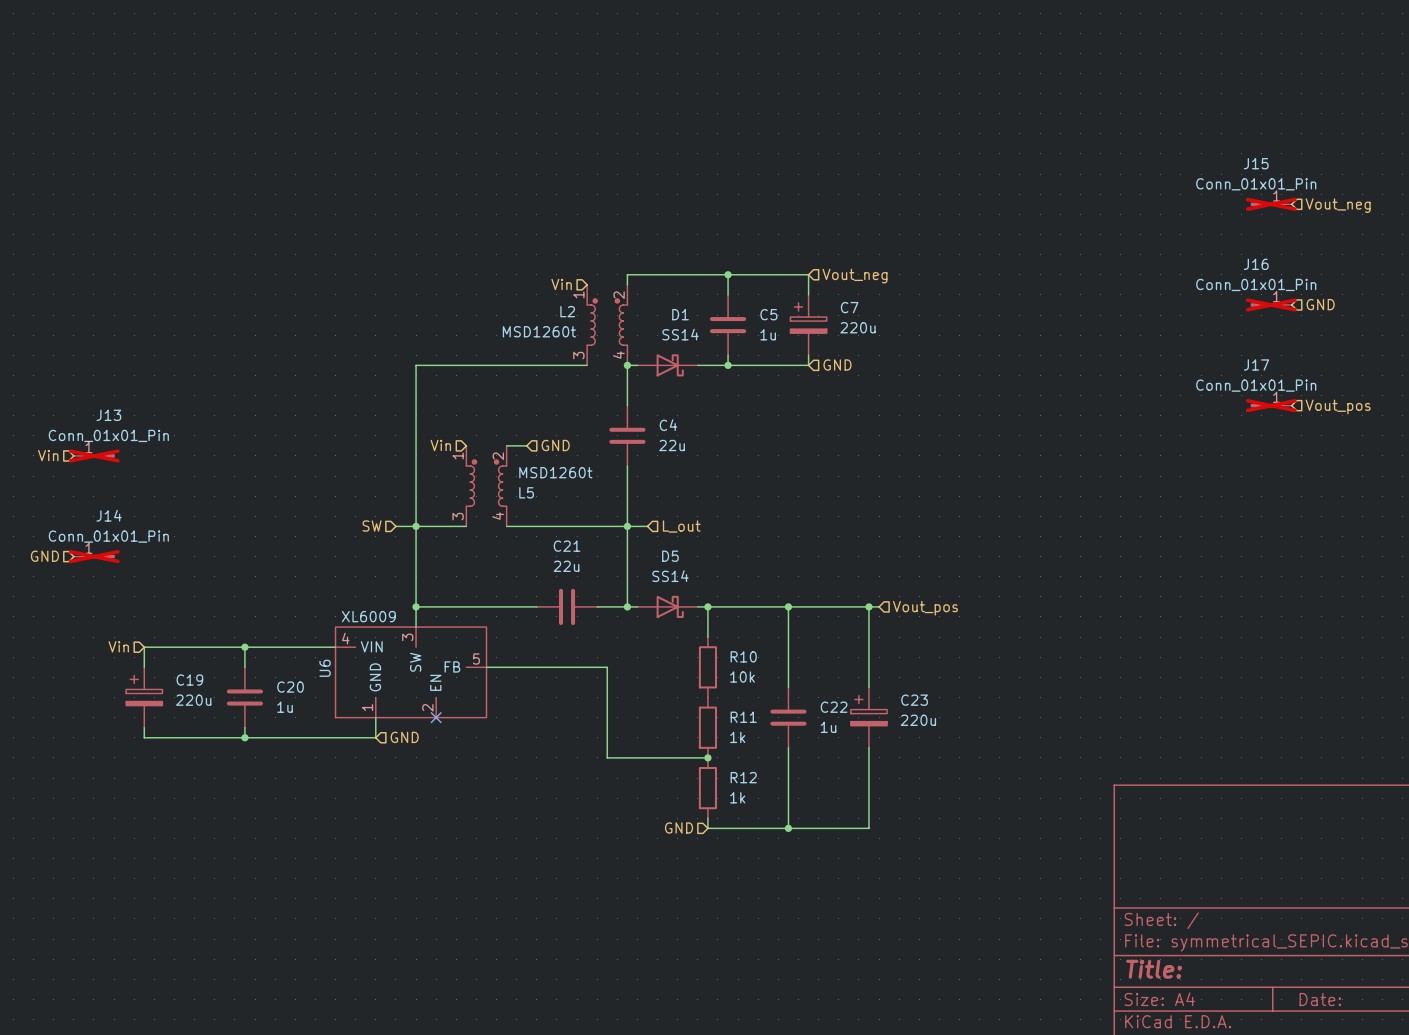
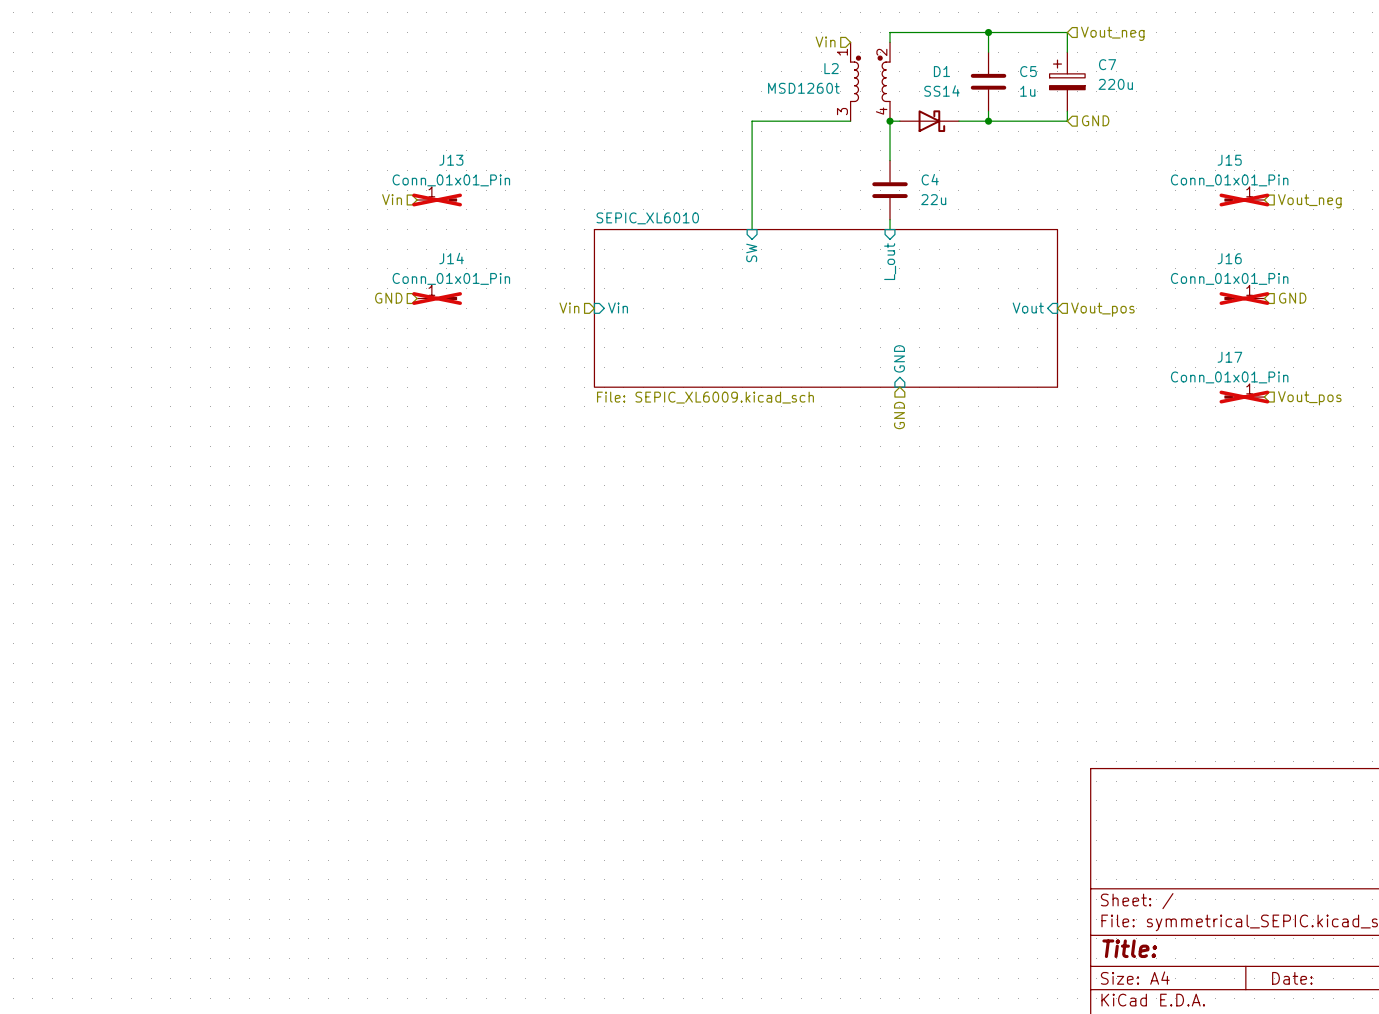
wire: none -> (988, 32) (988, 52)
junction: none -> (988, 32)
hierarchical label: none -> Vout_neg (1112, 33)
hierarchical label: none -> Vin (825, 41)
wire: none -> (890, 42) (890, 32) (1067, 32) (1067, 52)
wire: none -> (988, 111) (988, 121)
wire: none -> (1067, 111) (1067, 121) (958, 121)
wire: none -> (850, 121) (752, 121) (752, 229)
junction: none -> (890, 121)
wire: none -> (899, 121) (890, 121) (890, 160)
junction: none -> (988, 121)
hierarchical label: none -> GND (1095, 120)
hierarchical label: none -> Vin (392, 199)
wire: none -> (890, 219) (890, 229)
sheet pin: none -> SW (751, 252)
sheet pin: none -> L_out (890, 261)
wire: (728, 274) (728, 294) -> none
junction: (728, 274) -> none
hierarchical label: Vout_neg (854, 276) -> none
hierarchical label position: Vin (561, 284) -> Vin (569, 308)
wire: (627, 284) (627, 274) (808, 274) (808, 294) -> none
sheet pin: none -> Vin (618, 308)
sheet pin: none -> Vout (1028, 308)
sheet SEPIC_XL6010: none -> File: SEPIC_XL6009.kicad_sch (825, 308)
hierarchical label: none -> Vout_pos (1102, 309)
L2 position: (607, 325) -> (870, 81)
C5 position: (728, 325) -> (988, 81)
C7 position: (808, 325) -> (1067, 81)
wire: (728, 355) (728, 365) -> none
wire: (808, 355) (808, 365) (697, 365) -> none
hierarchical label rotation: 0° (837, 364) -> 90° clockwise (899, 415)
hierarchical label position: GND (837, 364) -> GND (899, 415)
wire: (587, 365) (416, 365) (416, 627) -> none
junction: (627, 365) -> none
wire: (637, 365) (627, 365) (627, 405) -> none
D1 position: (667, 365) -> (929, 121)
junction: (728, 365) -> none
sheet pin: none -> GND (899, 358)
C4 position: (627, 435) -> (890, 190)
hierarchical label: Vin (440, 445) -> none
wire: (506, 445) (526, 445) -> none
hierarchical label rotation: 0° (555, 445) -> 180° (388, 298)
hierarchical label position: GND (555, 445) -> GND (388, 298)
hierarchical label: Vin (48, 455) -> none
J13 position: (94, 455) -> (437, 200)
wire: (627, 466) (627, 606) -> none
L5: MSD1260t (486, 486) -> none
hierarchical label: SW (372, 526) -> none
wire: (395, 526) (466, 526) -> none
junction: (416, 526) -> none
wire: (506, 526) (647, 526) -> none
junction: (627, 526) -> none
hierarchical label: L_out (681, 526) -> none
hierarchical label: GND (44, 556) -> none
J14 position: (94, 556) -> (437, 298)
wire: (416, 606) (536, 606) -> none
junction: (416, 606) -> none
C21: 22u (567, 606) -> none
wire: (597, 606) (637, 606) -> none
junction: (627, 606) -> none
D5: SS14 (667, 606) -> none
wire: (697, 606) (879, 606) -> none
wire: (707, 606) (707, 637) -> none
junction: (707, 606) -> none
wire: (788, 606) (788, 687) -> none
junction: (788, 606) -> none
wire: (868, 606) (868, 687) -> none
junction: (868, 606) -> none
hierarchical label: Vout_pos (925, 608) -> none
hierarchical label: Vin (118, 646) -> none
wire: (244, 647) (244, 667) -> none
junction: (244, 647) -> none
wire: (335, 647) (144, 647) (144, 667) -> none
wire: (486, 667) (607, 667) (607, 757) (707, 757) -> none
R10: 10k (707, 667) -> none
U6: XL6009 (411, 672) -> none
C19: 220u (144, 697) -> none
C20: 1u (244, 697) -> none
wire: (375, 717) (375, 737) (144, 737) (144, 727) -> none
no-connect mark: (436, 717) -> none
C22: 1u (788, 717) -> none
C23: 220u (868, 717) -> none
wire: (244, 727) (244, 737) -> none
R11: 1k (707, 727) -> none
junction: (244, 737) -> none
hierarchical label: GND (404, 737) -> none
wire: (788, 747) (788, 828) -> none
wire: (868, 747) (868, 828) (707, 828) (707, 818) -> none
junction: (707, 757) -> none
R12: 1k (707, 788) -> none
hierarchical label: GND (679, 827) -> none
junction: (788, 828) -> none

